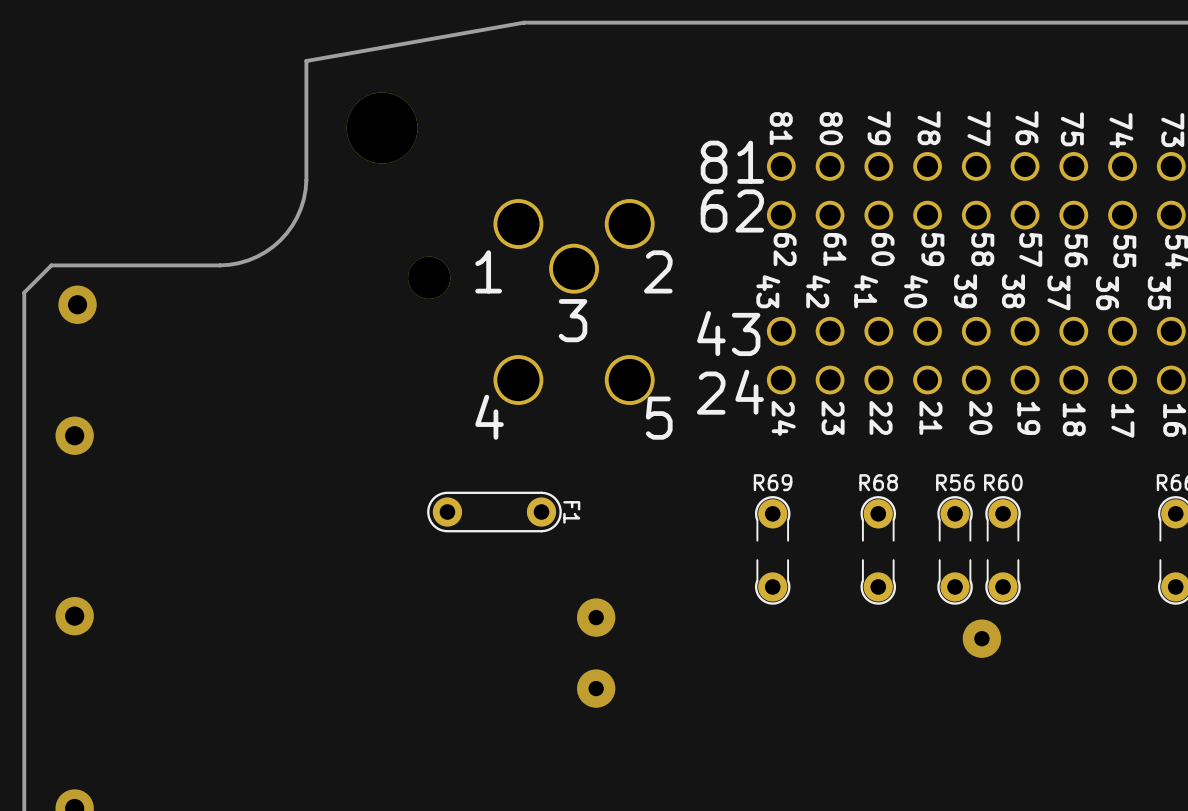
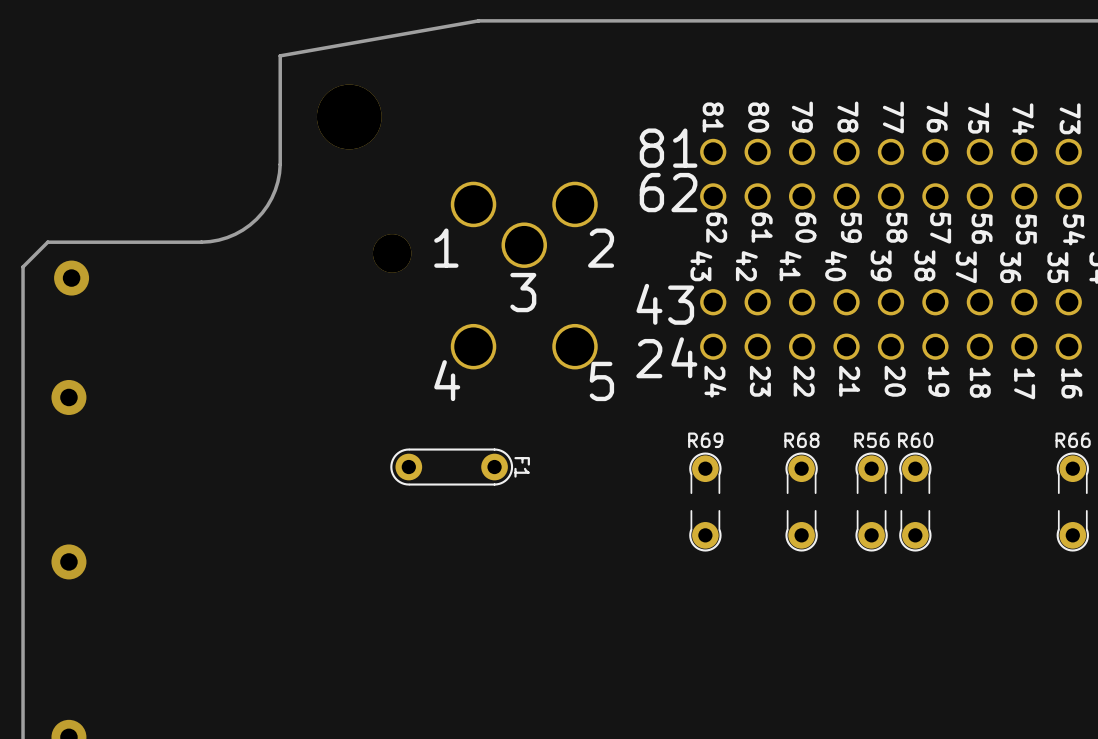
via: (596, 617) -> none
via: (981, 638) -> none
via: (596, 688) -> none

